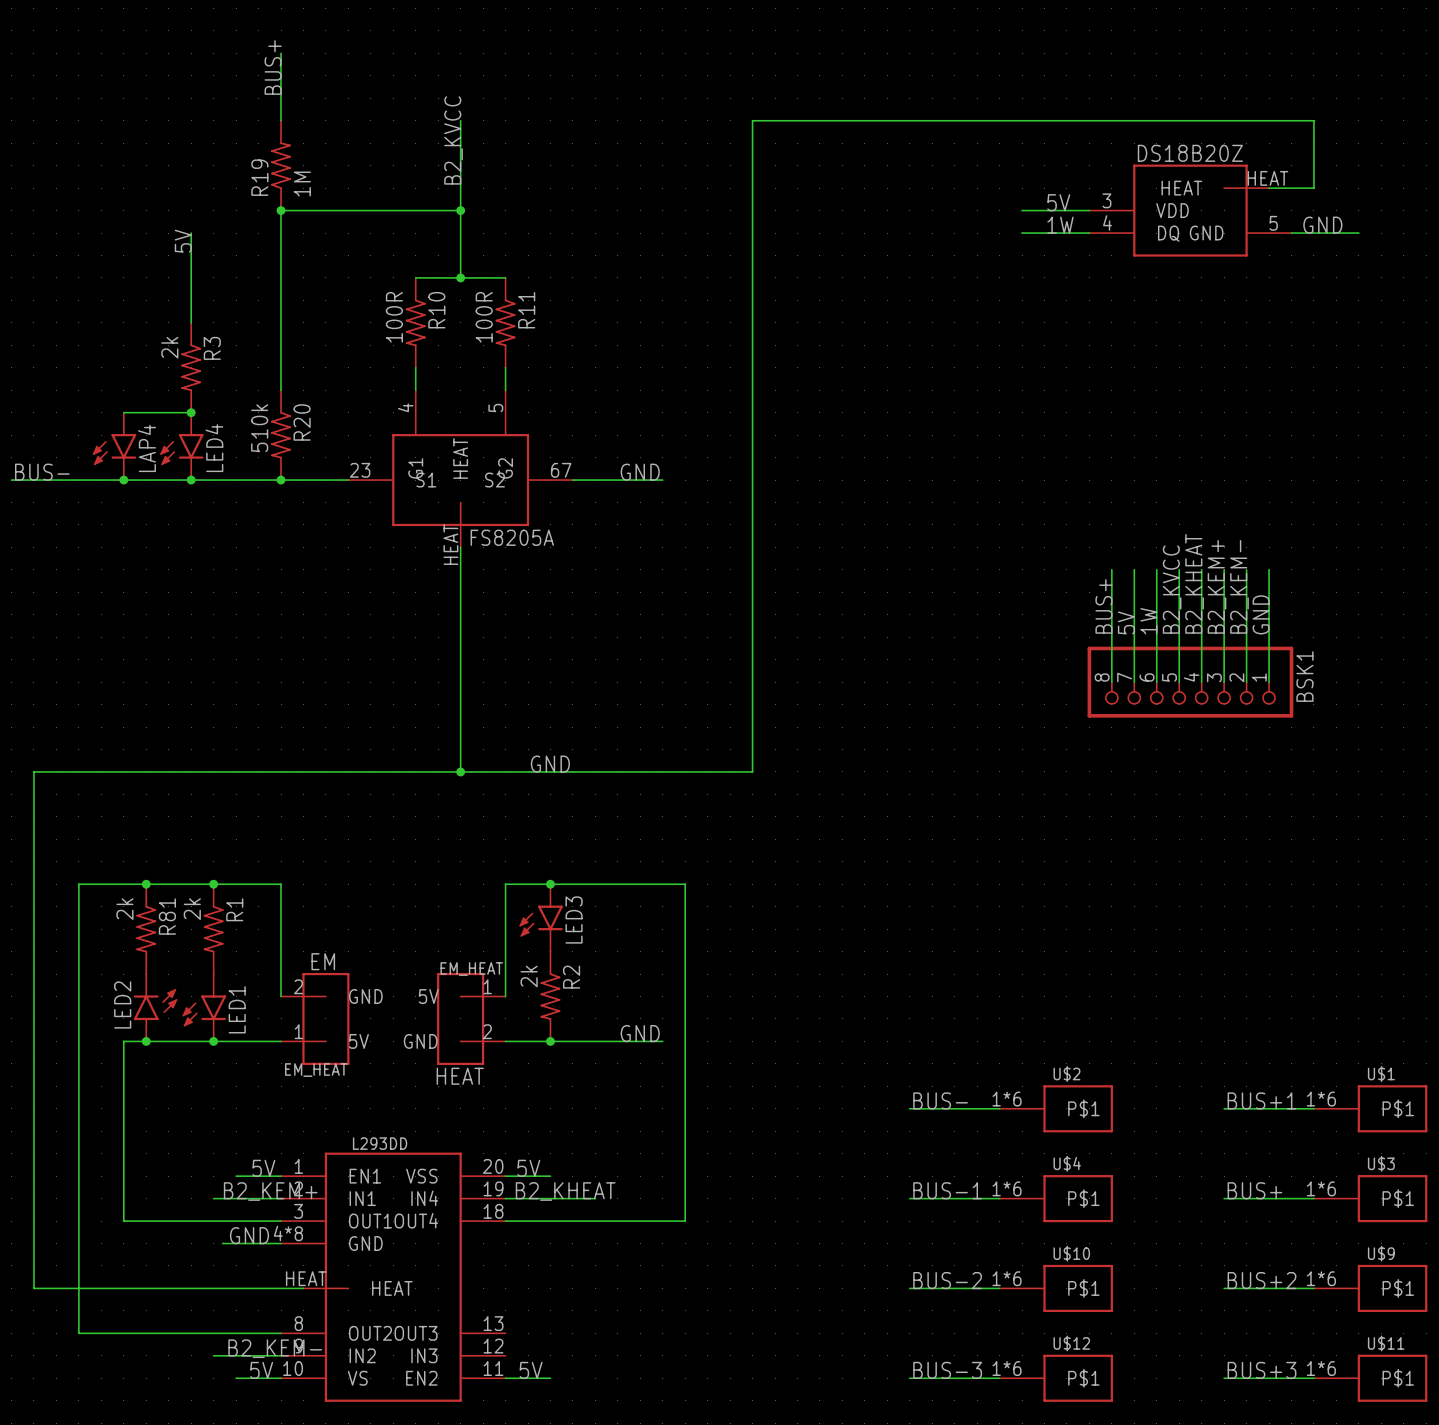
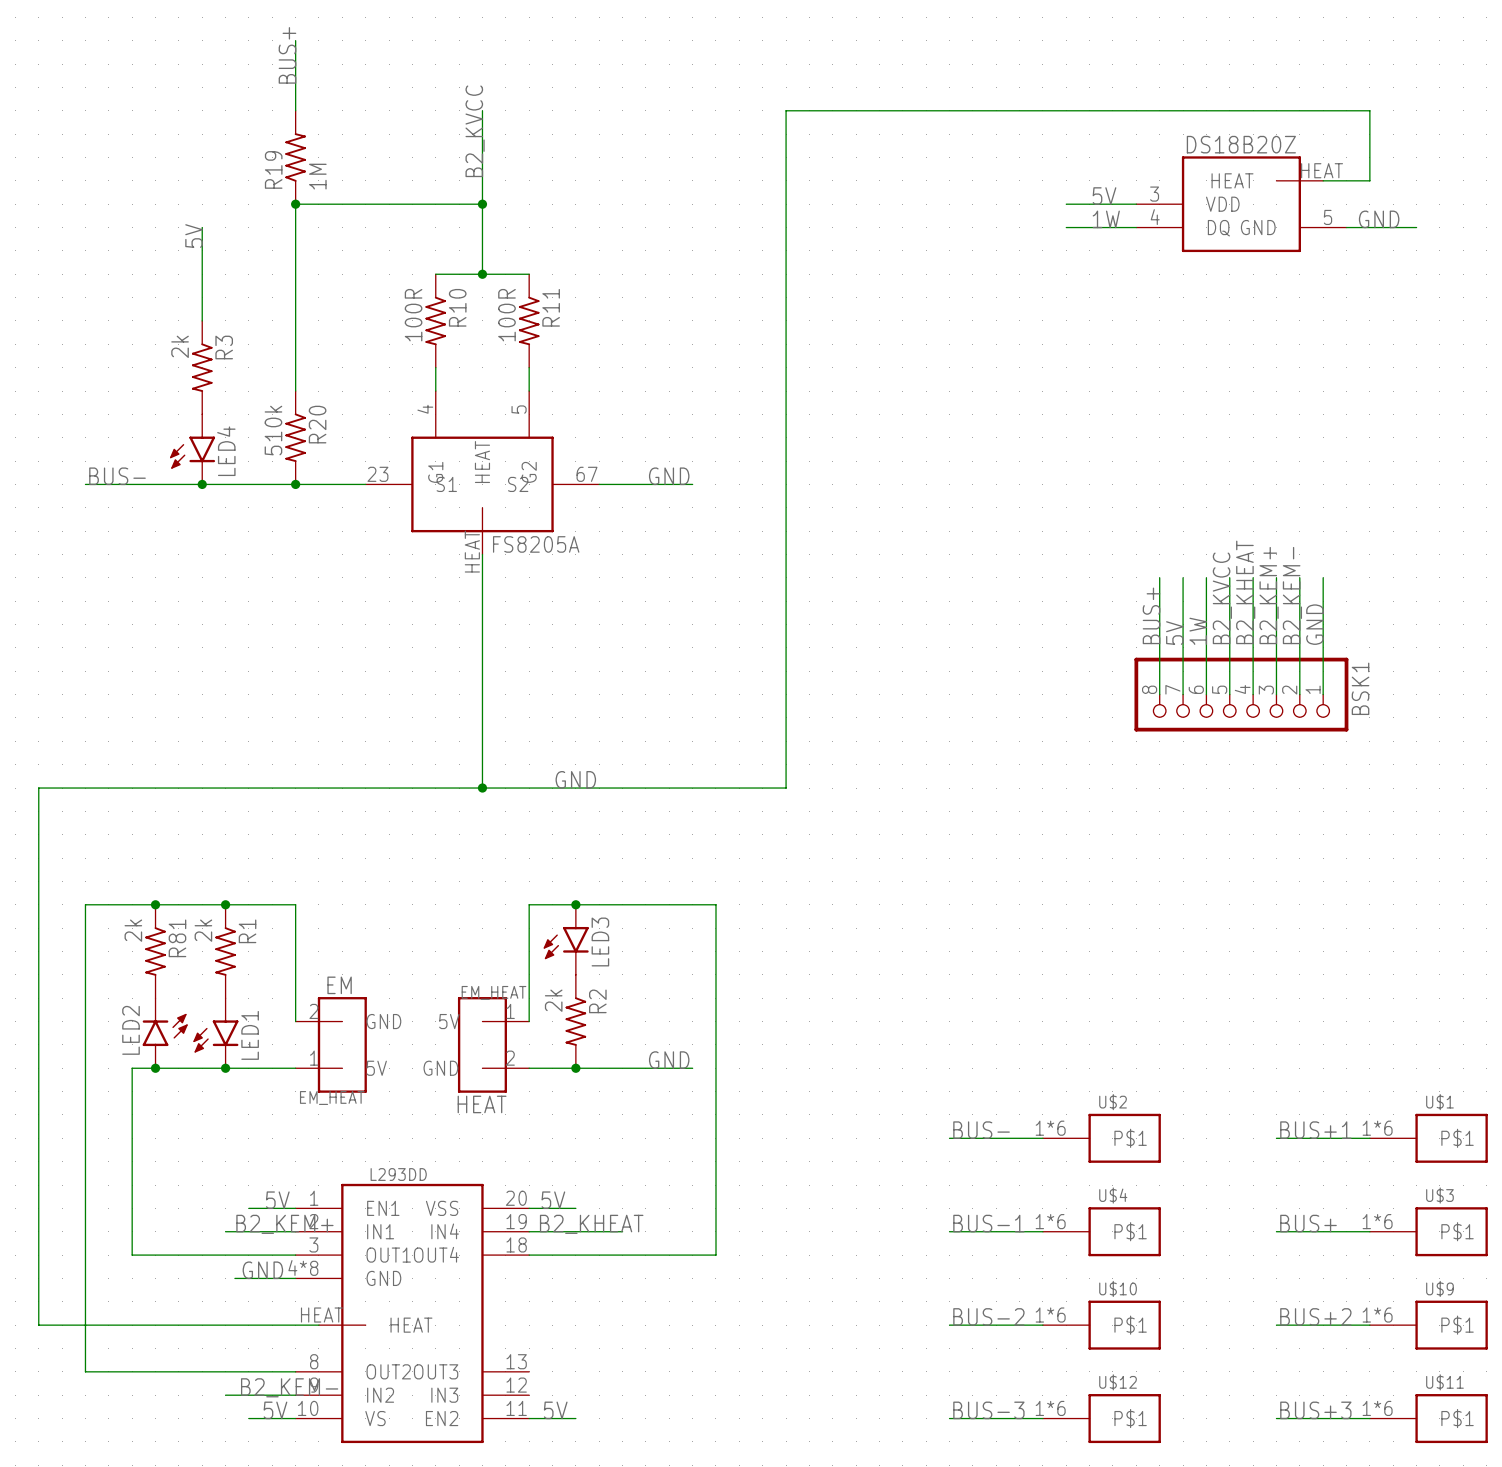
wire: (123, 412) (191, 412) -> none
junction: (191, 412) -> none
LAP4: (114, 446) -> none
label position: BUS- (42, 472) -> BUS- (117, 476)
wire: (11, 480) (78, 480) -> none
junction: (123, 480) -> none

